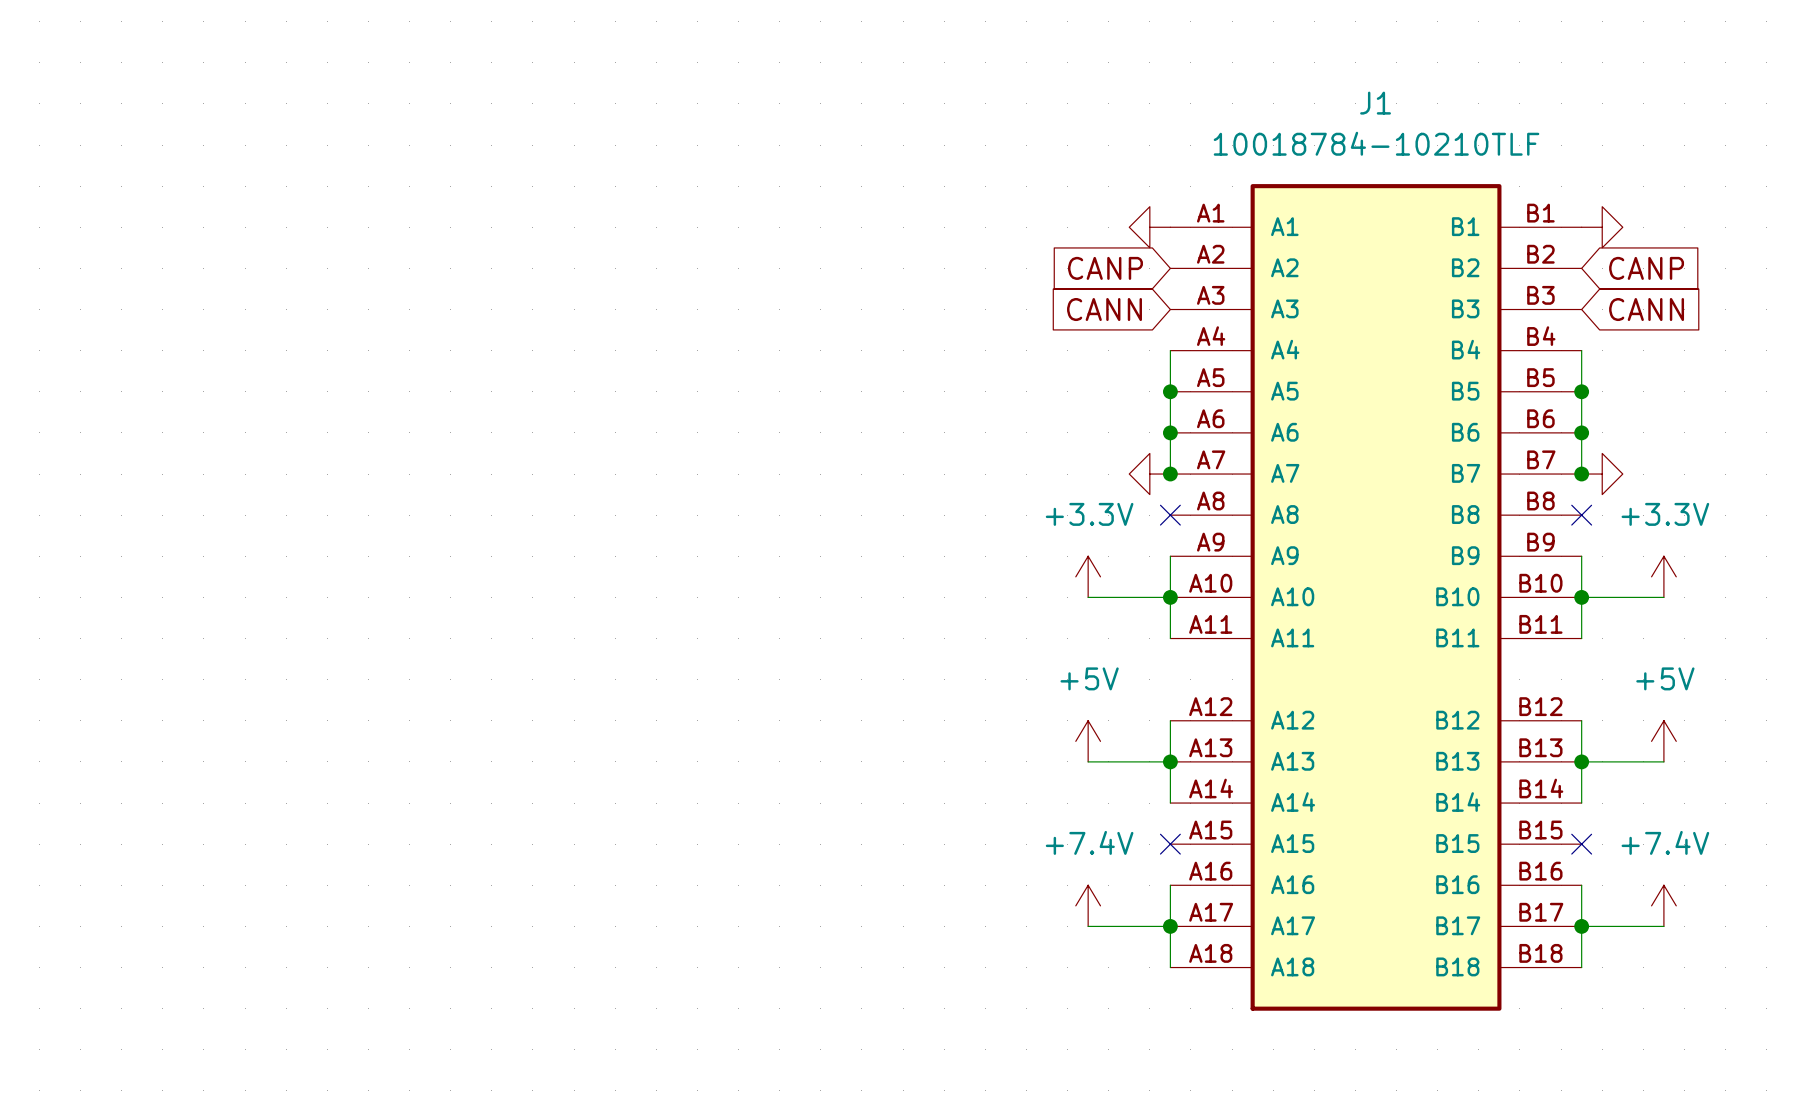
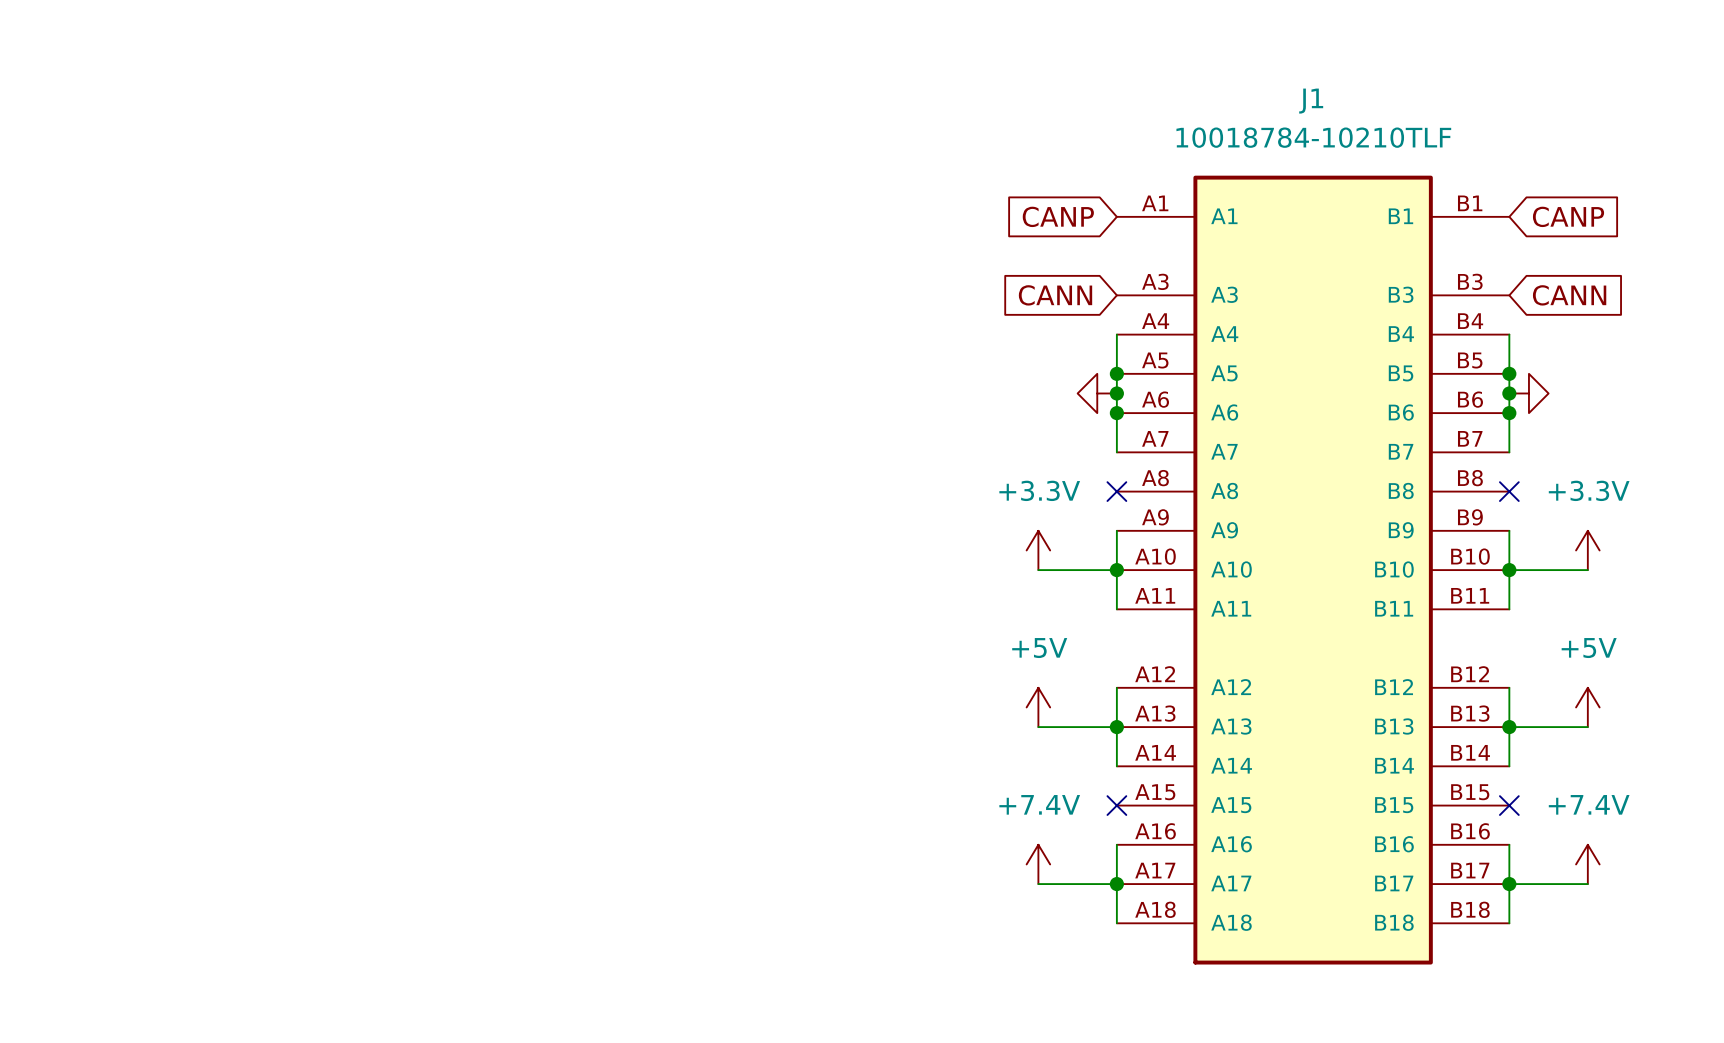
J1 symbol: [1170, 184, 1582, 1011] -> [1116, 175, 1510, 965]
power symbol: (1149, 227) -> none
power symbol: (1602, 227) -> none
global label position: CANP (1105, 268) -> CANP (1058, 216)
global label position: CANP (1646, 268) -> CANP (1568, 216)
power symbol position: (1149, 474) -> (1097, 393)
junction position: (1170, 474) -> (1116, 393)
junction position: (1581, 474) -> (1509, 393)
power symbol position: (1602, 474) -> (1528, 393)

